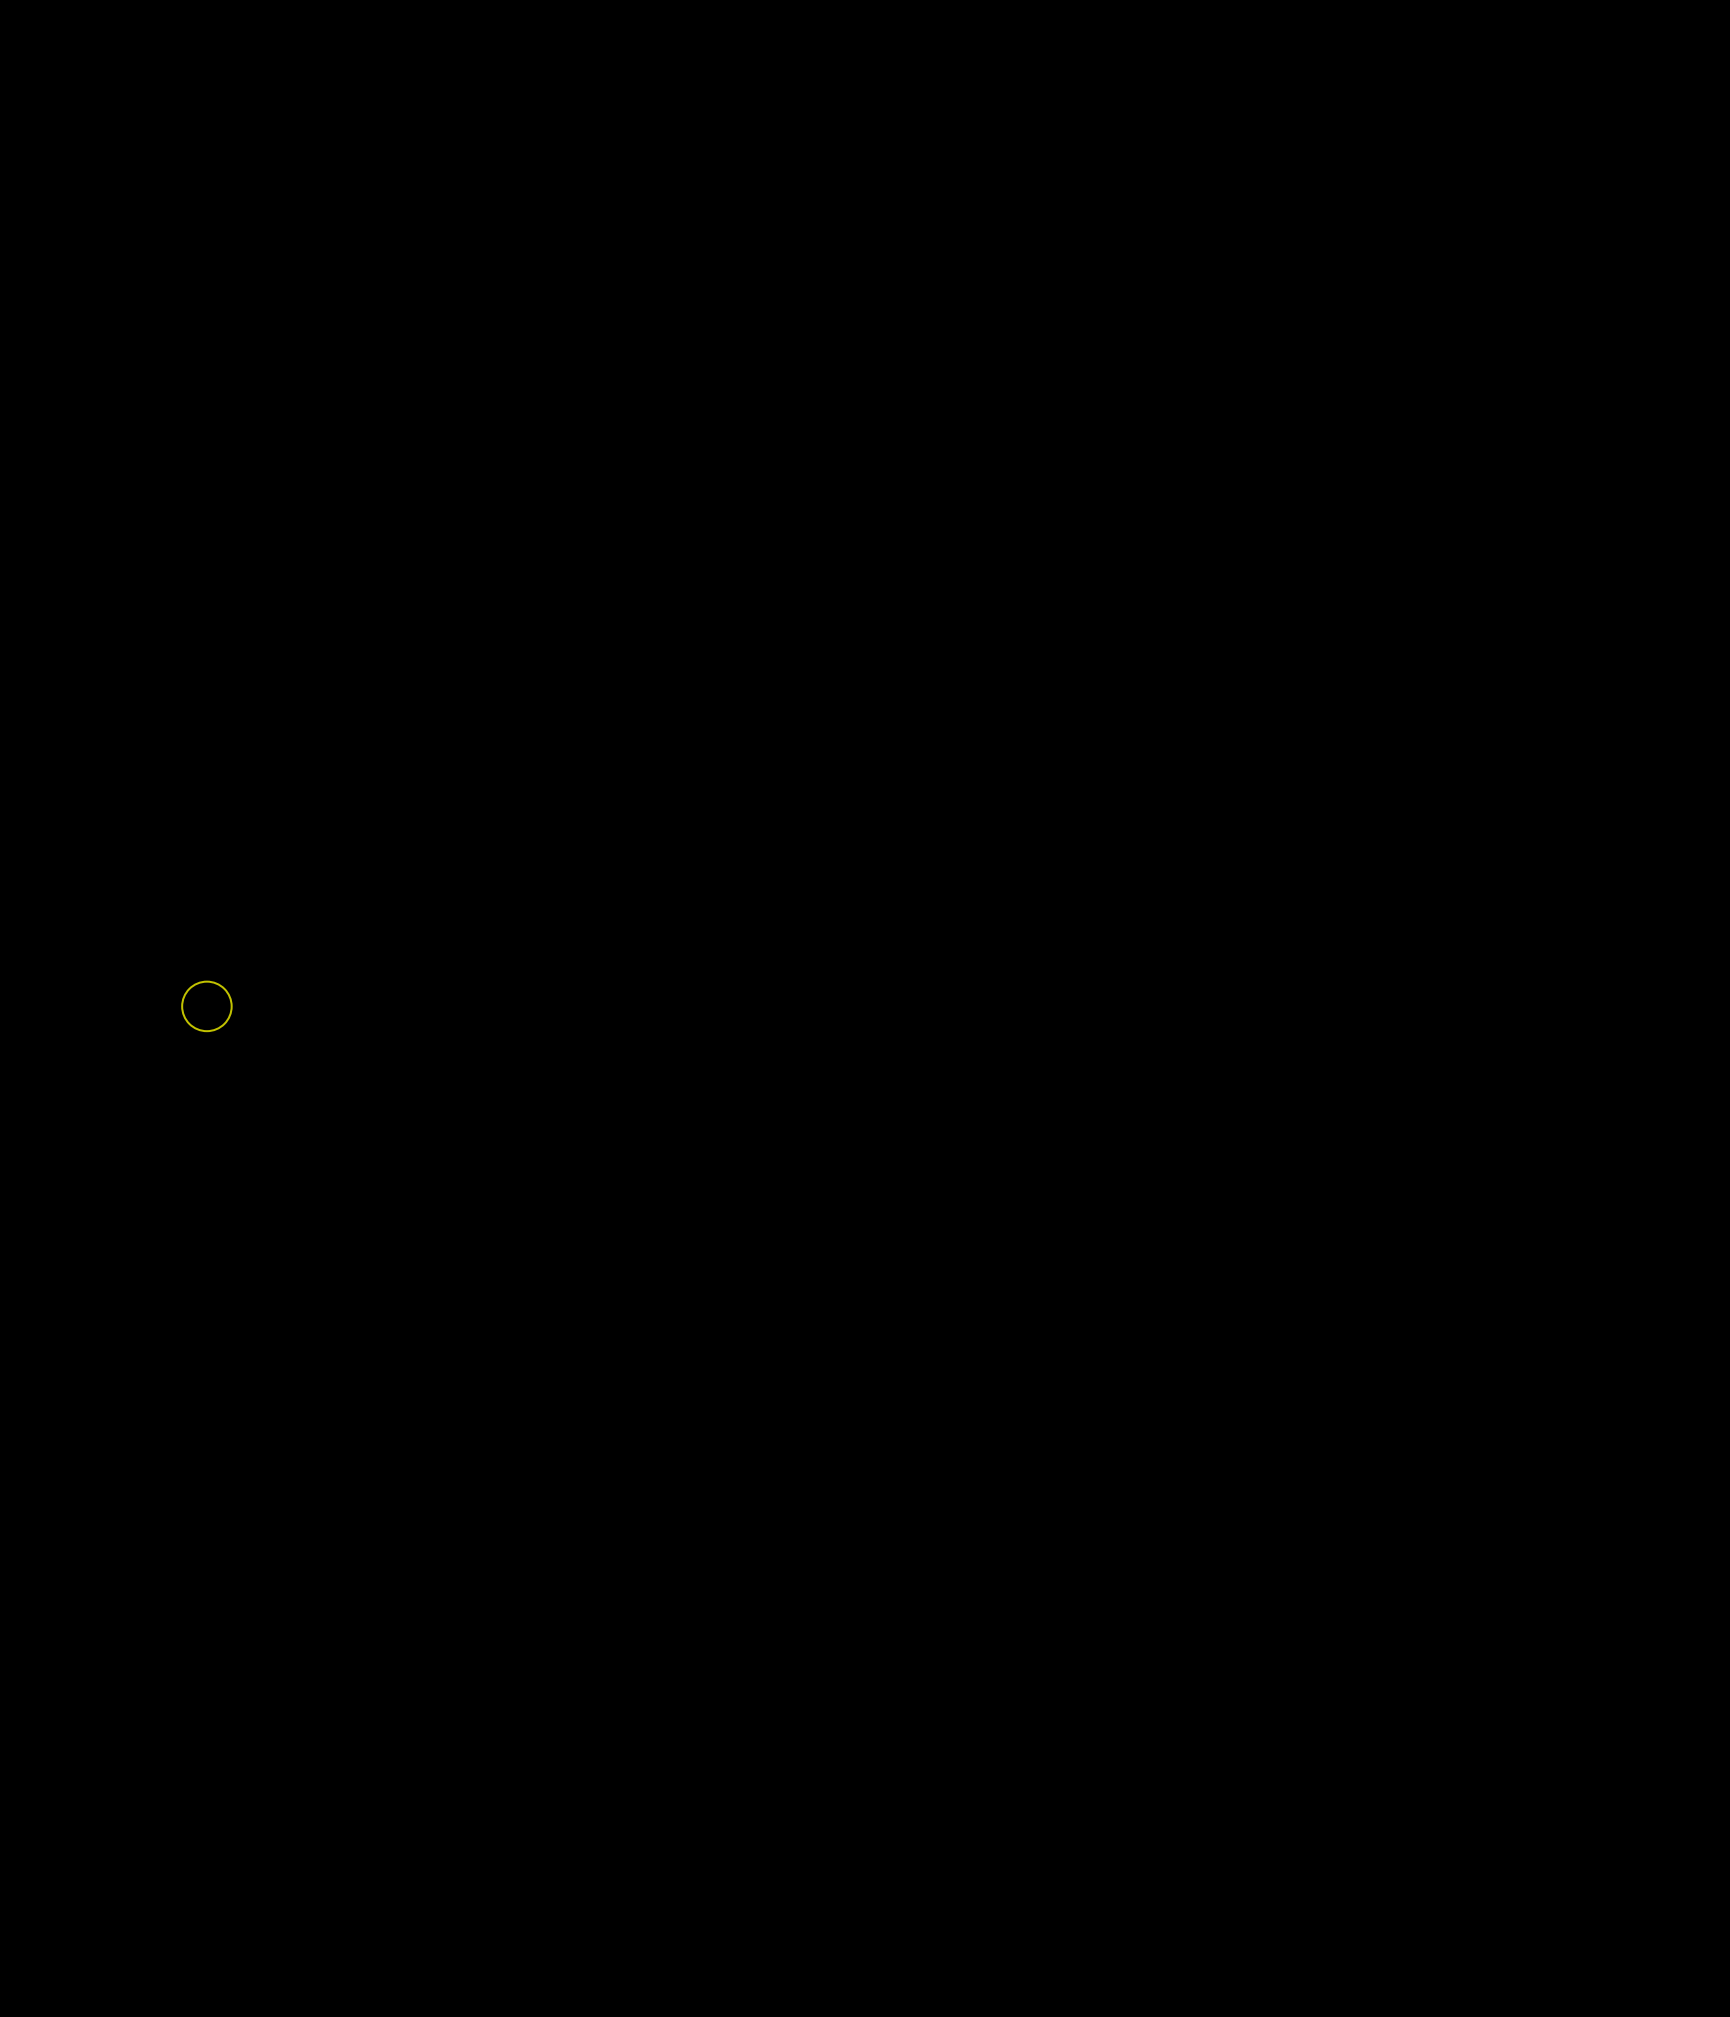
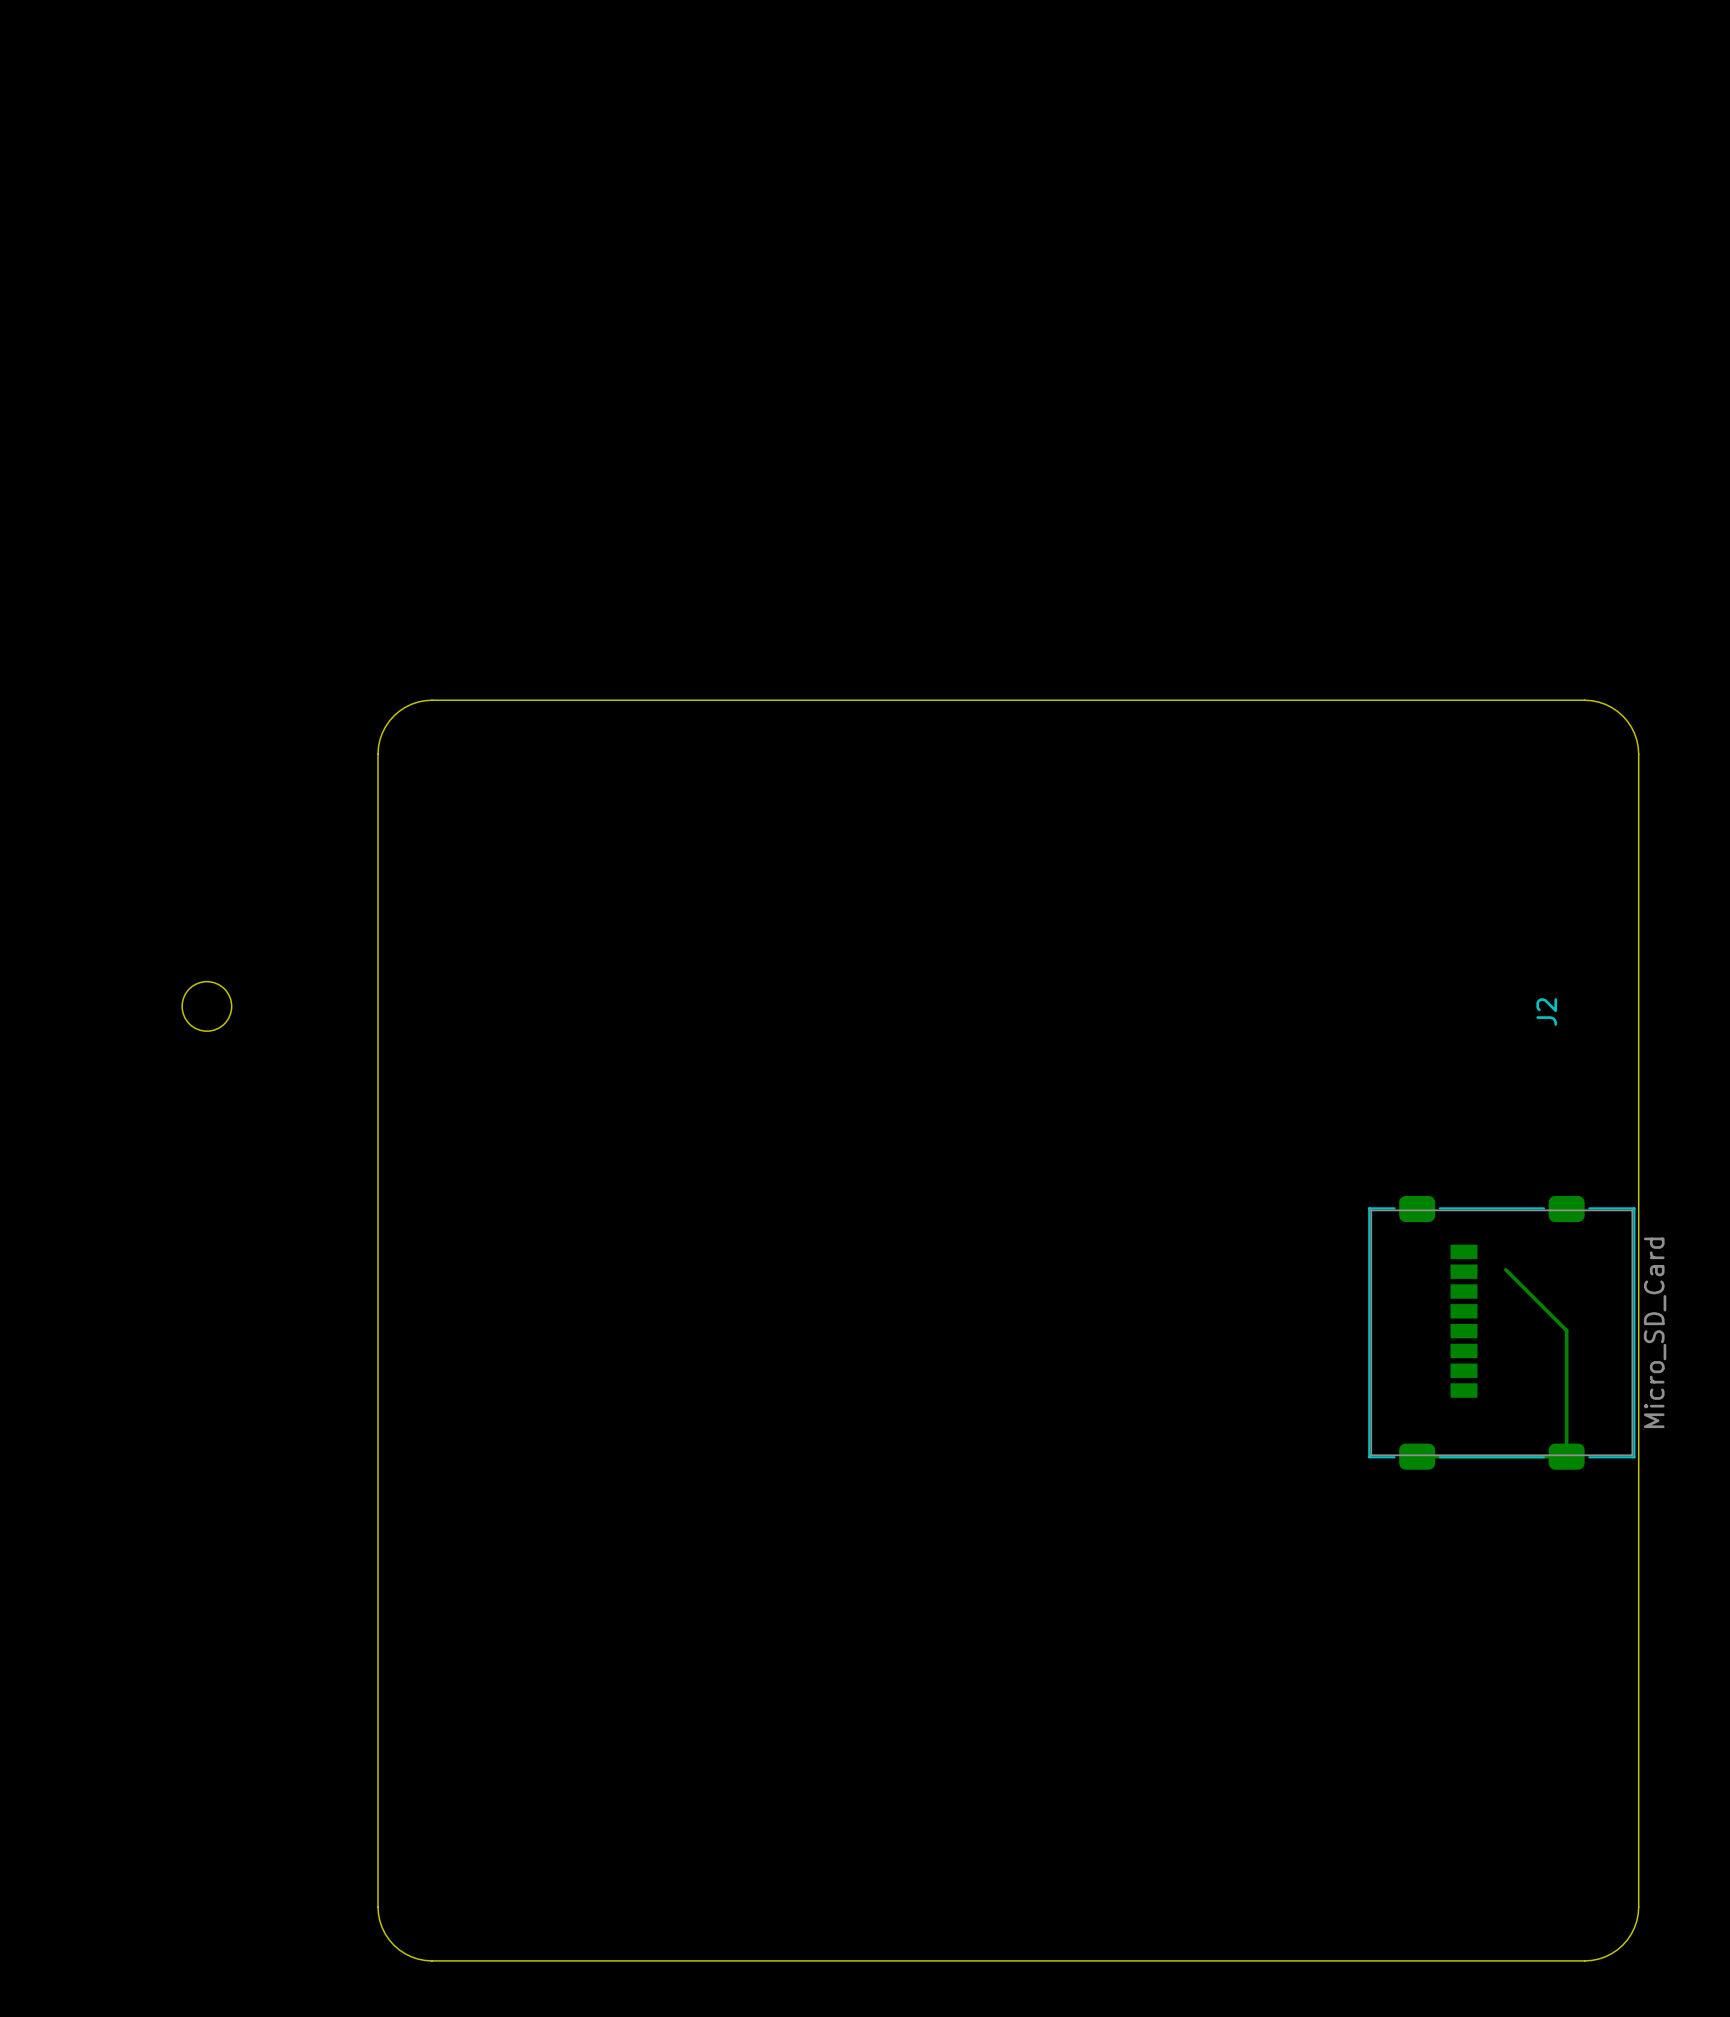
board edge: none -> (1584, 700) (432, 700) (411, 704) (393, 716) (382, 733) (378, 754) (378, 1906) (382, 1927) (393, 1945) (411, 1956) (432, 1960) (1584, 1960) (1605, 1956) (1622, 1945) (1634, 1927) (1638, 1906) (1638, 754) (1634, 733) (1622, 716) (1605, 704) (1584, 700)
track: none -> (1505, 1269) (1566, 1330) (1566, 1456) (1417, 1456)
J2: none -> Micro_SD_Card (1501, 1332)

